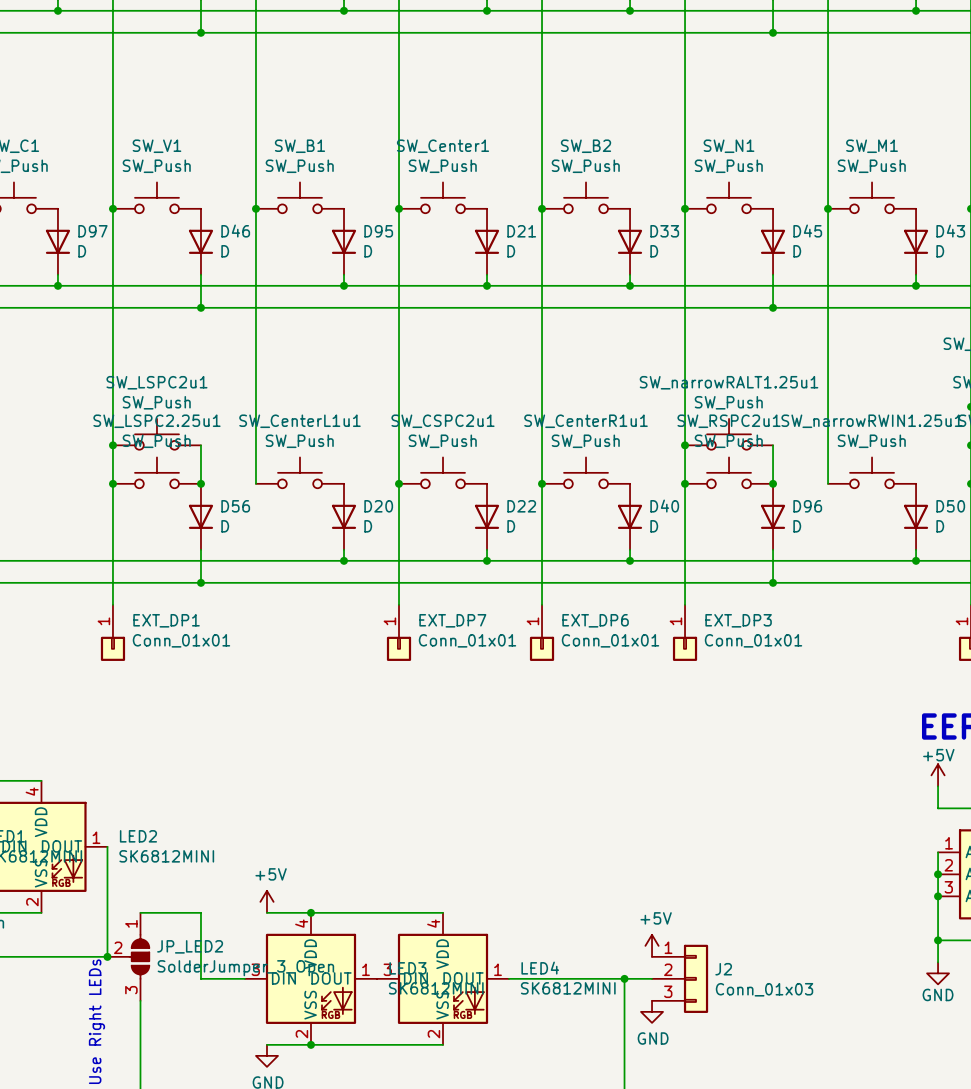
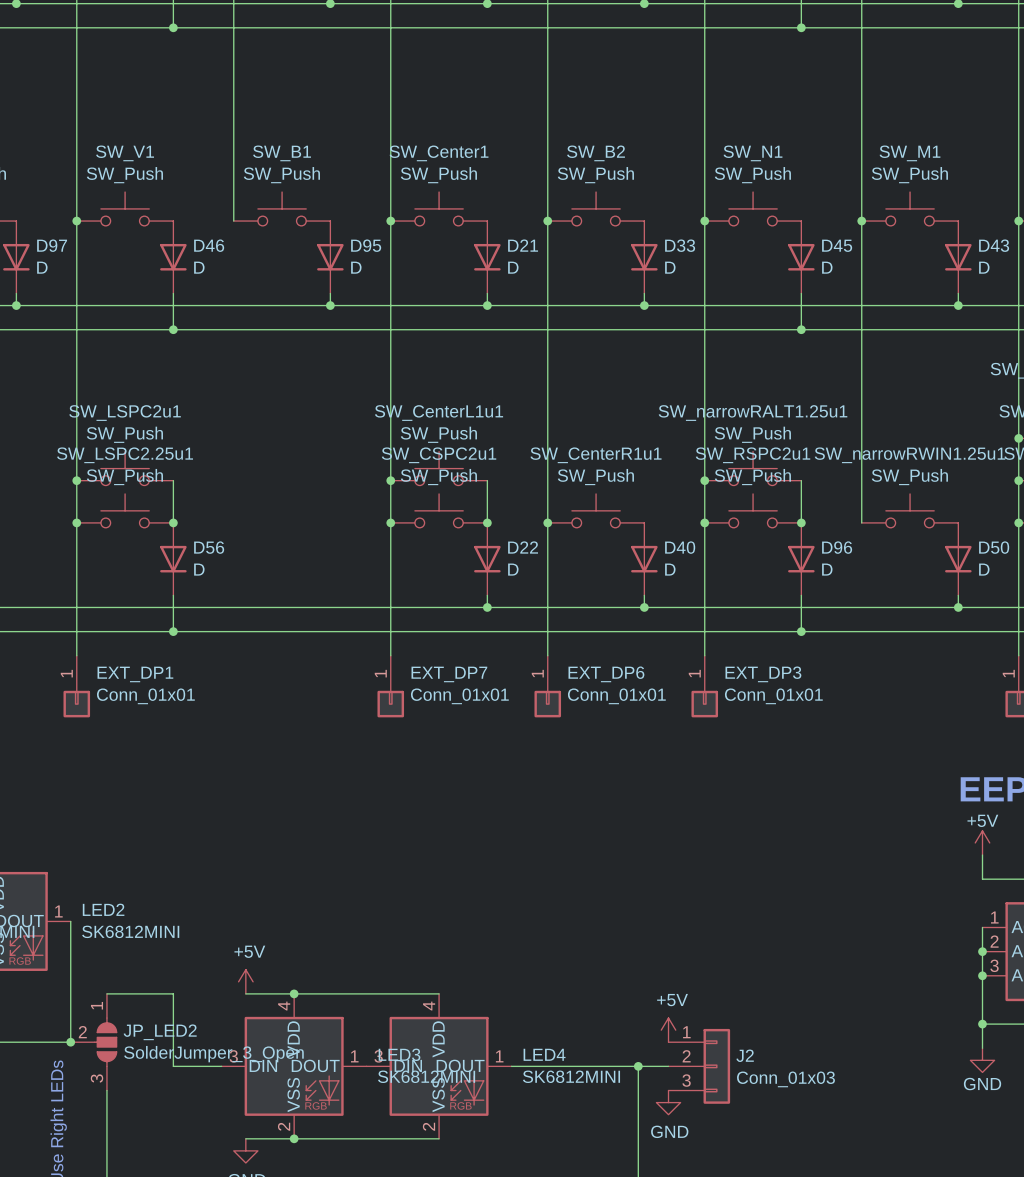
wire: (255, 208) (255, 483) -> none
junction: (255, 208) -> none
junction: none -> (390, 480)
wire: none -> (487, 480) (487, 522)
SW_CenterL1u1 position: (299, 472) -> (439, 468)
junction: none -> (487, 522)
D20: D (344, 516) -> none
wire: (344, 549) (344, 560) -> none
junction: (344, 560) -> none

